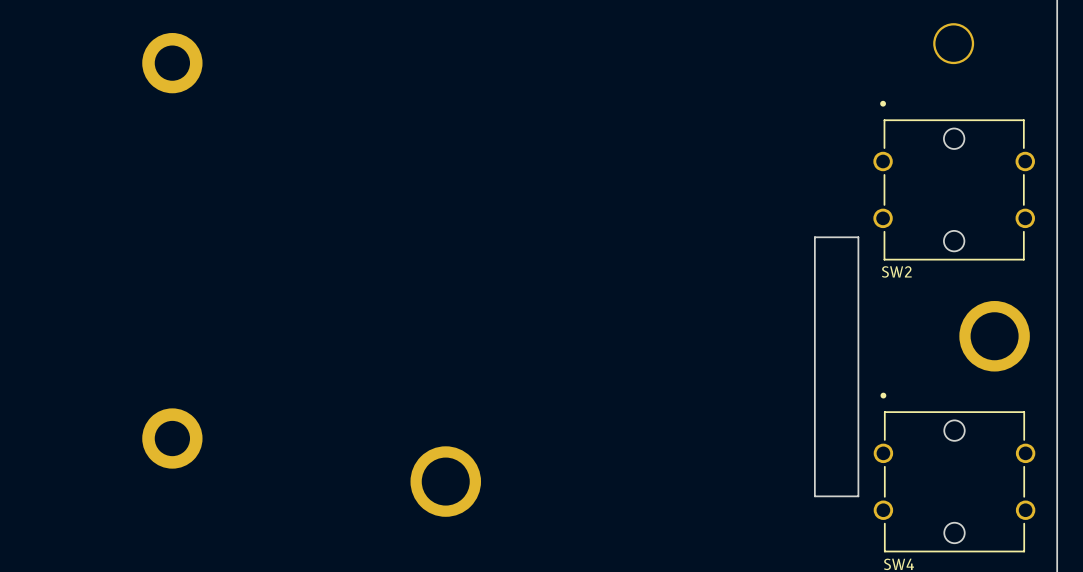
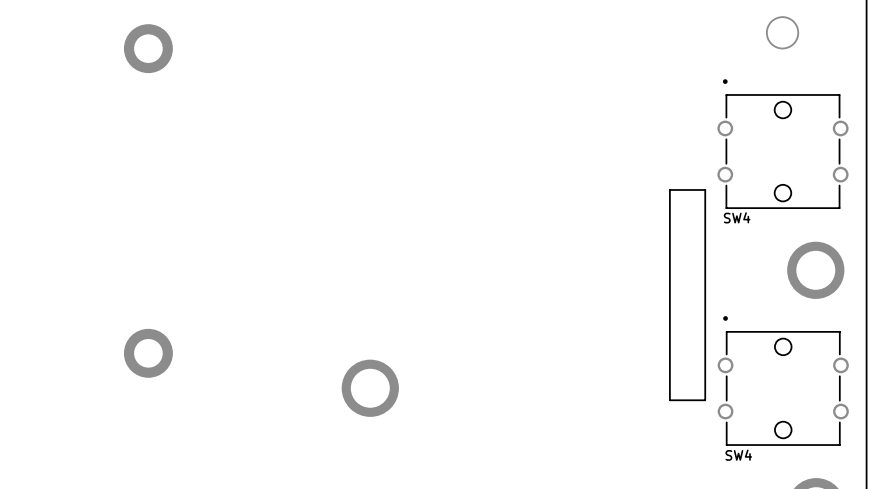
SW2 name: SW2 (896, 271) -> SW4 (737, 217)

